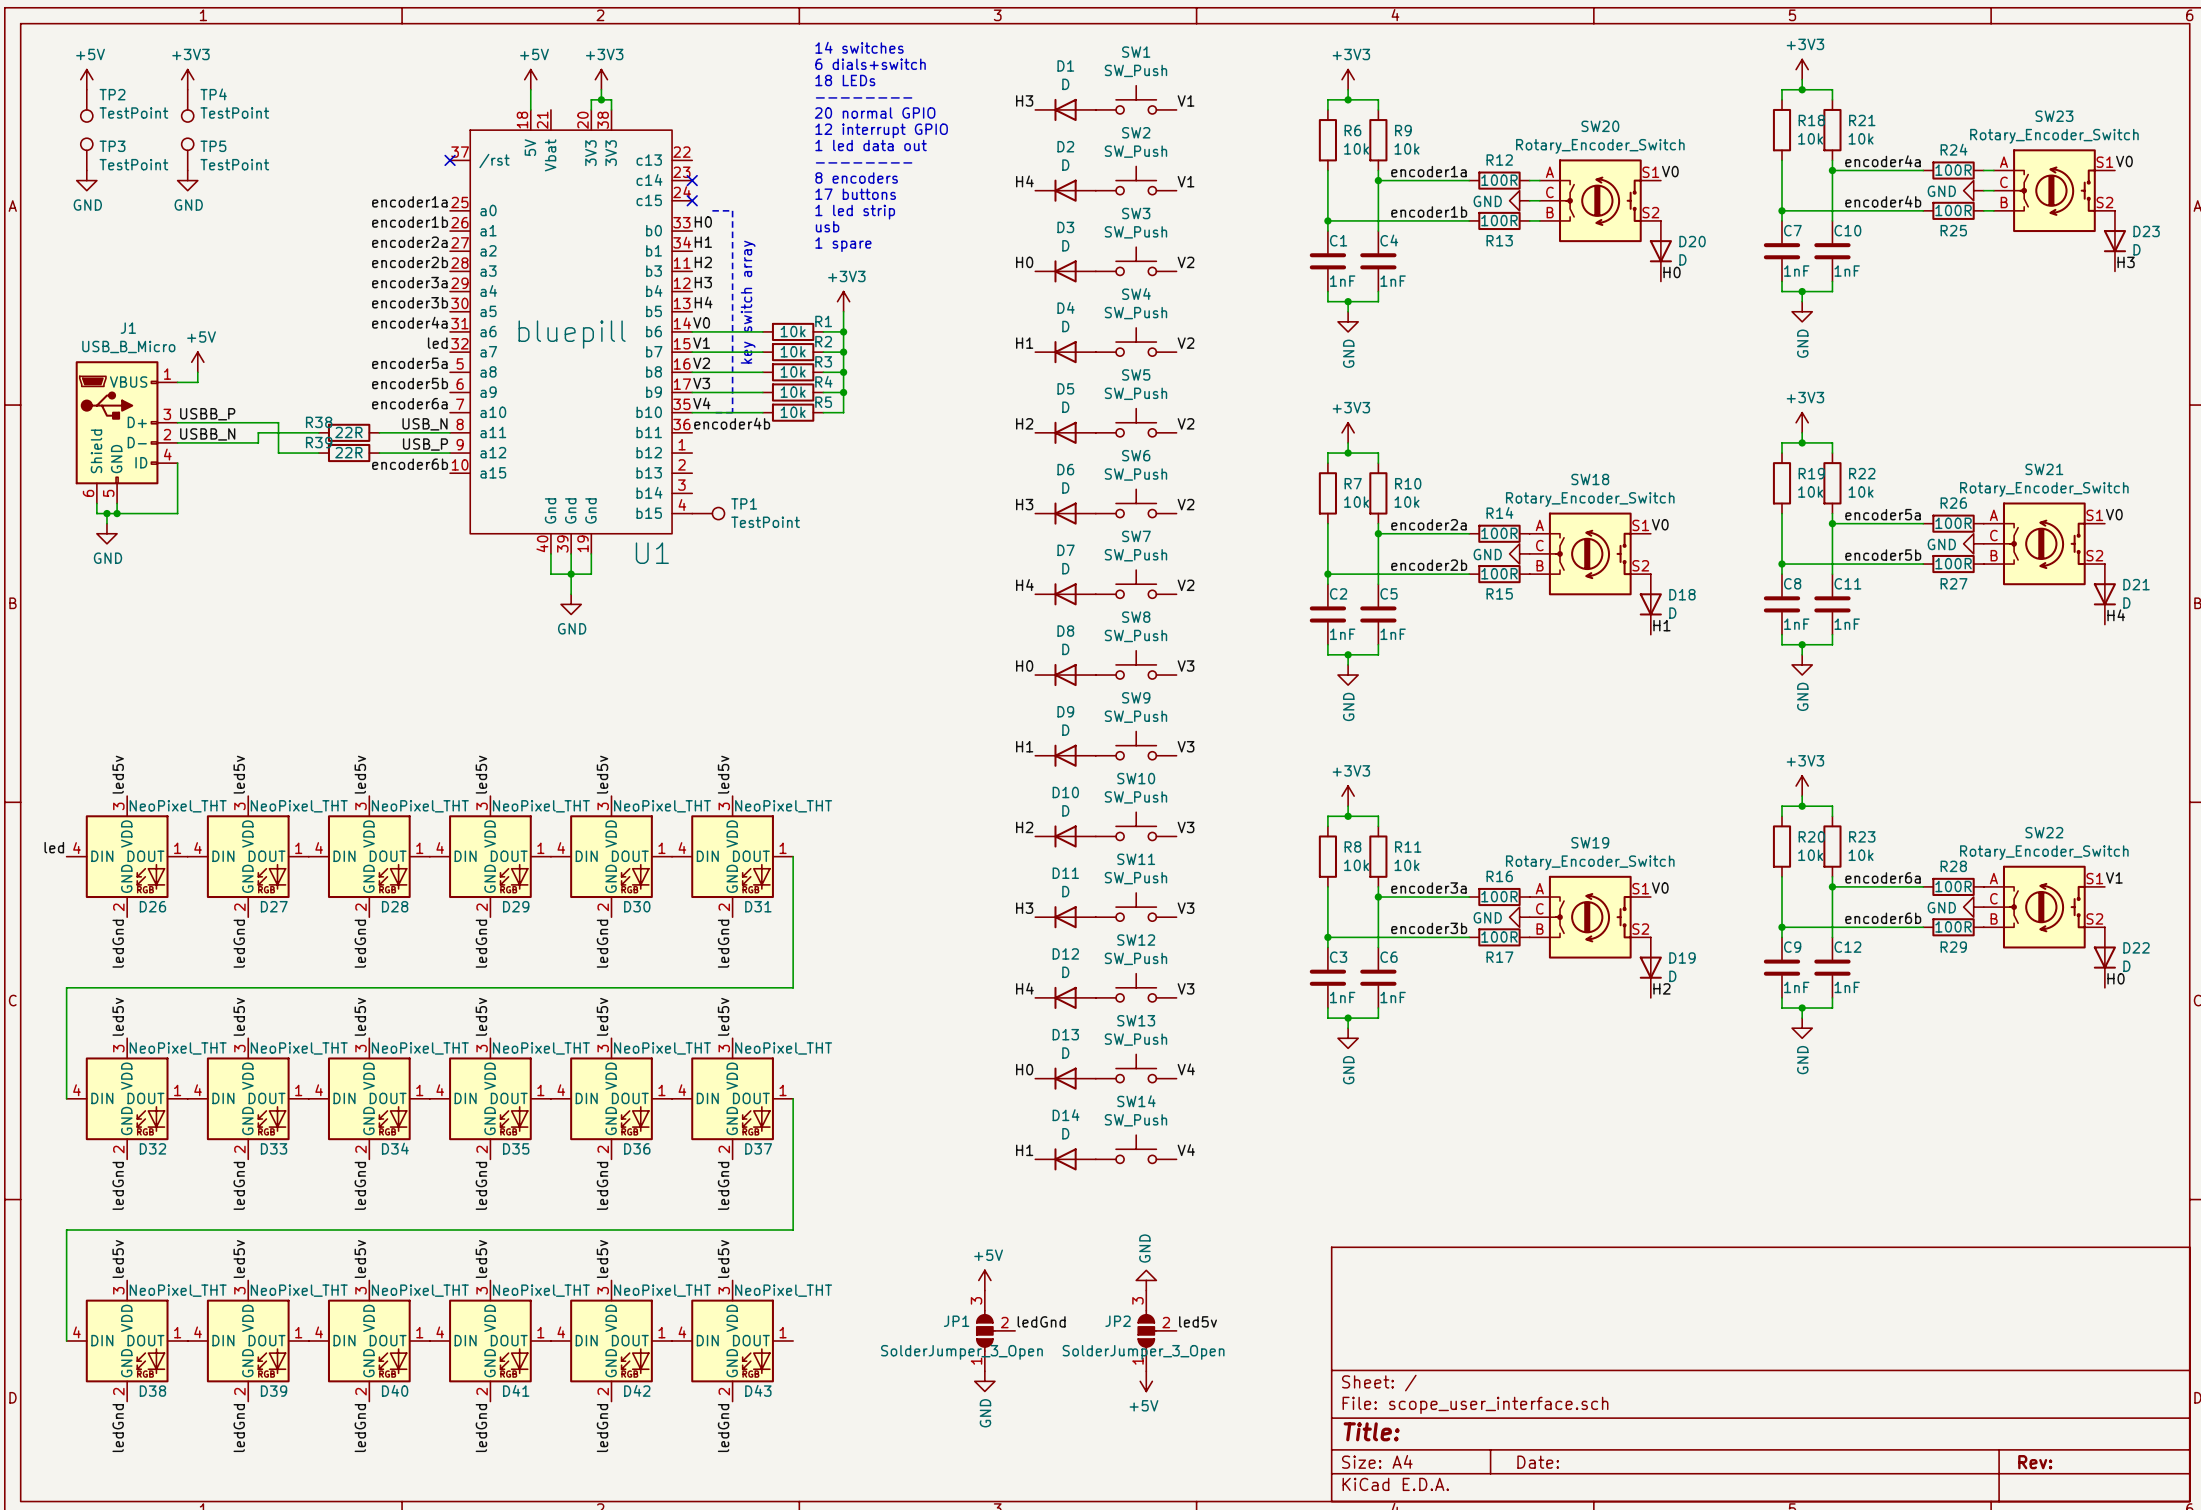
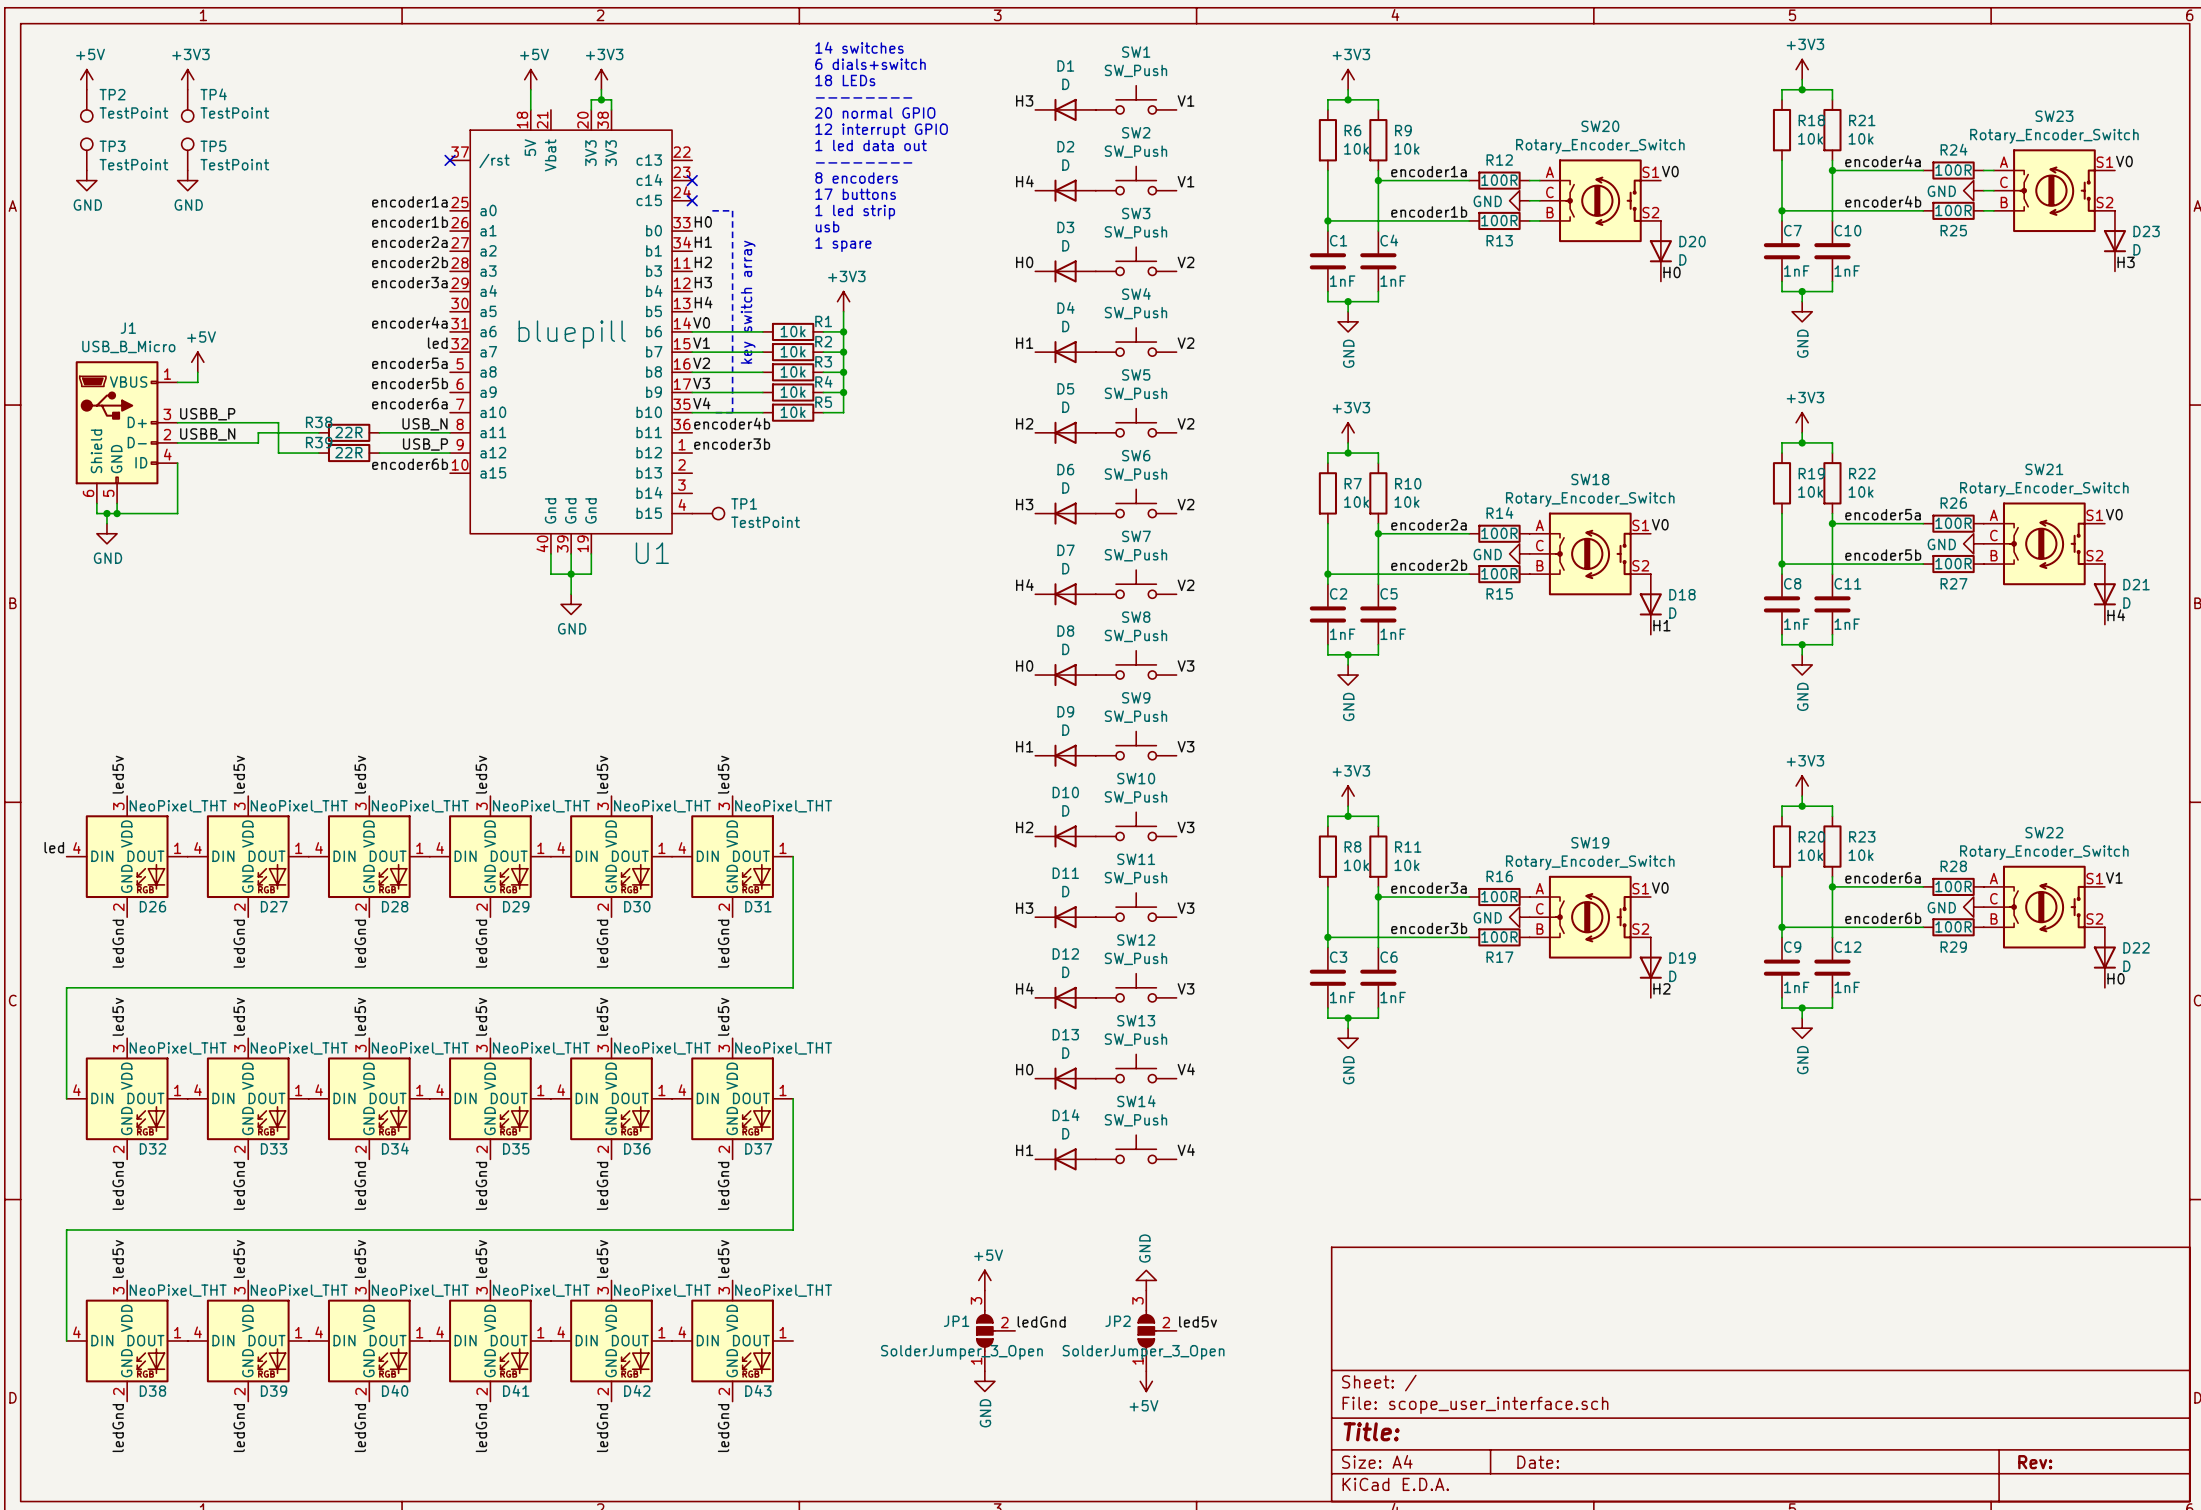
label: encoder3b (410, 302) -> none
label: none -> encoder3b (732, 444)

